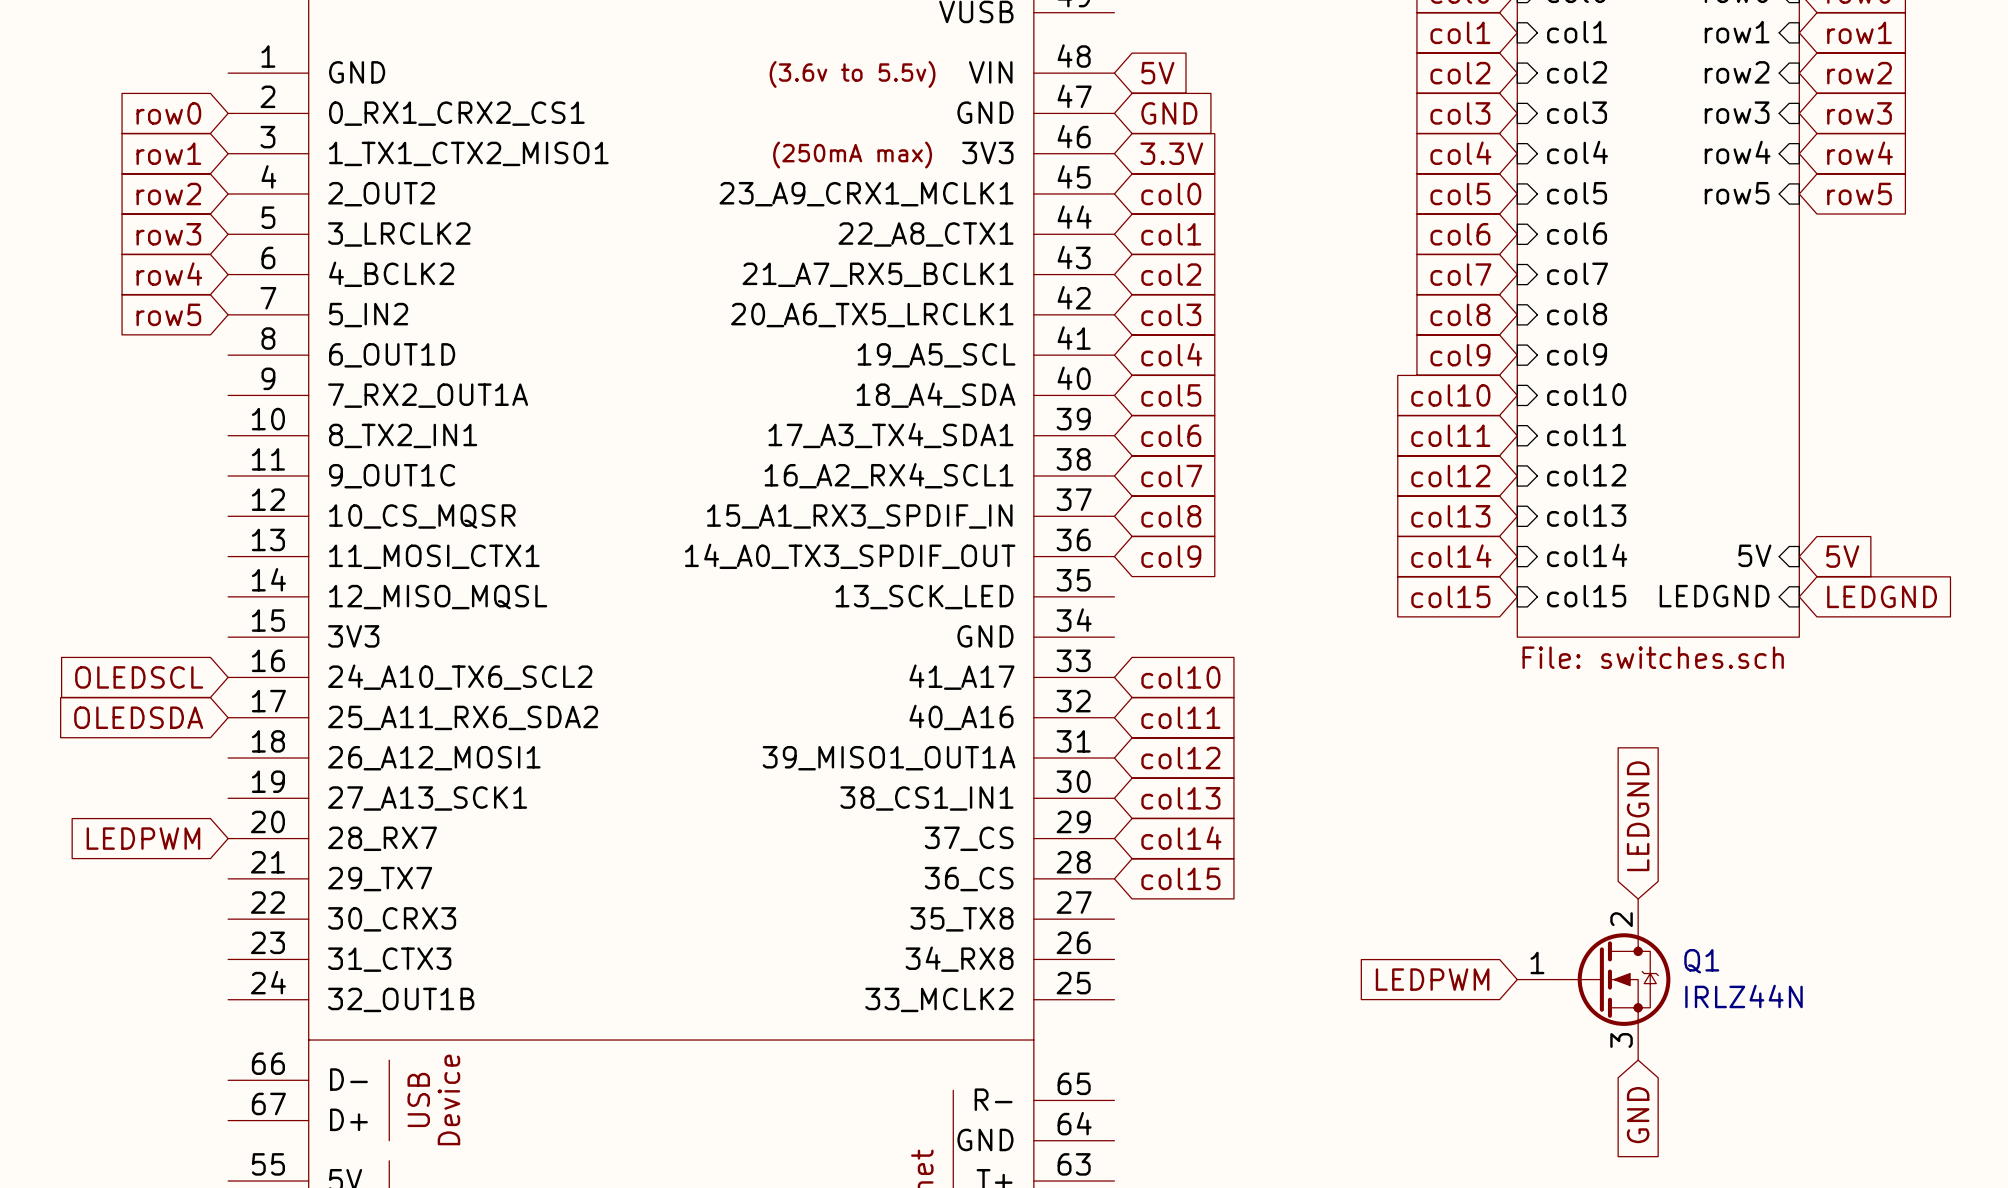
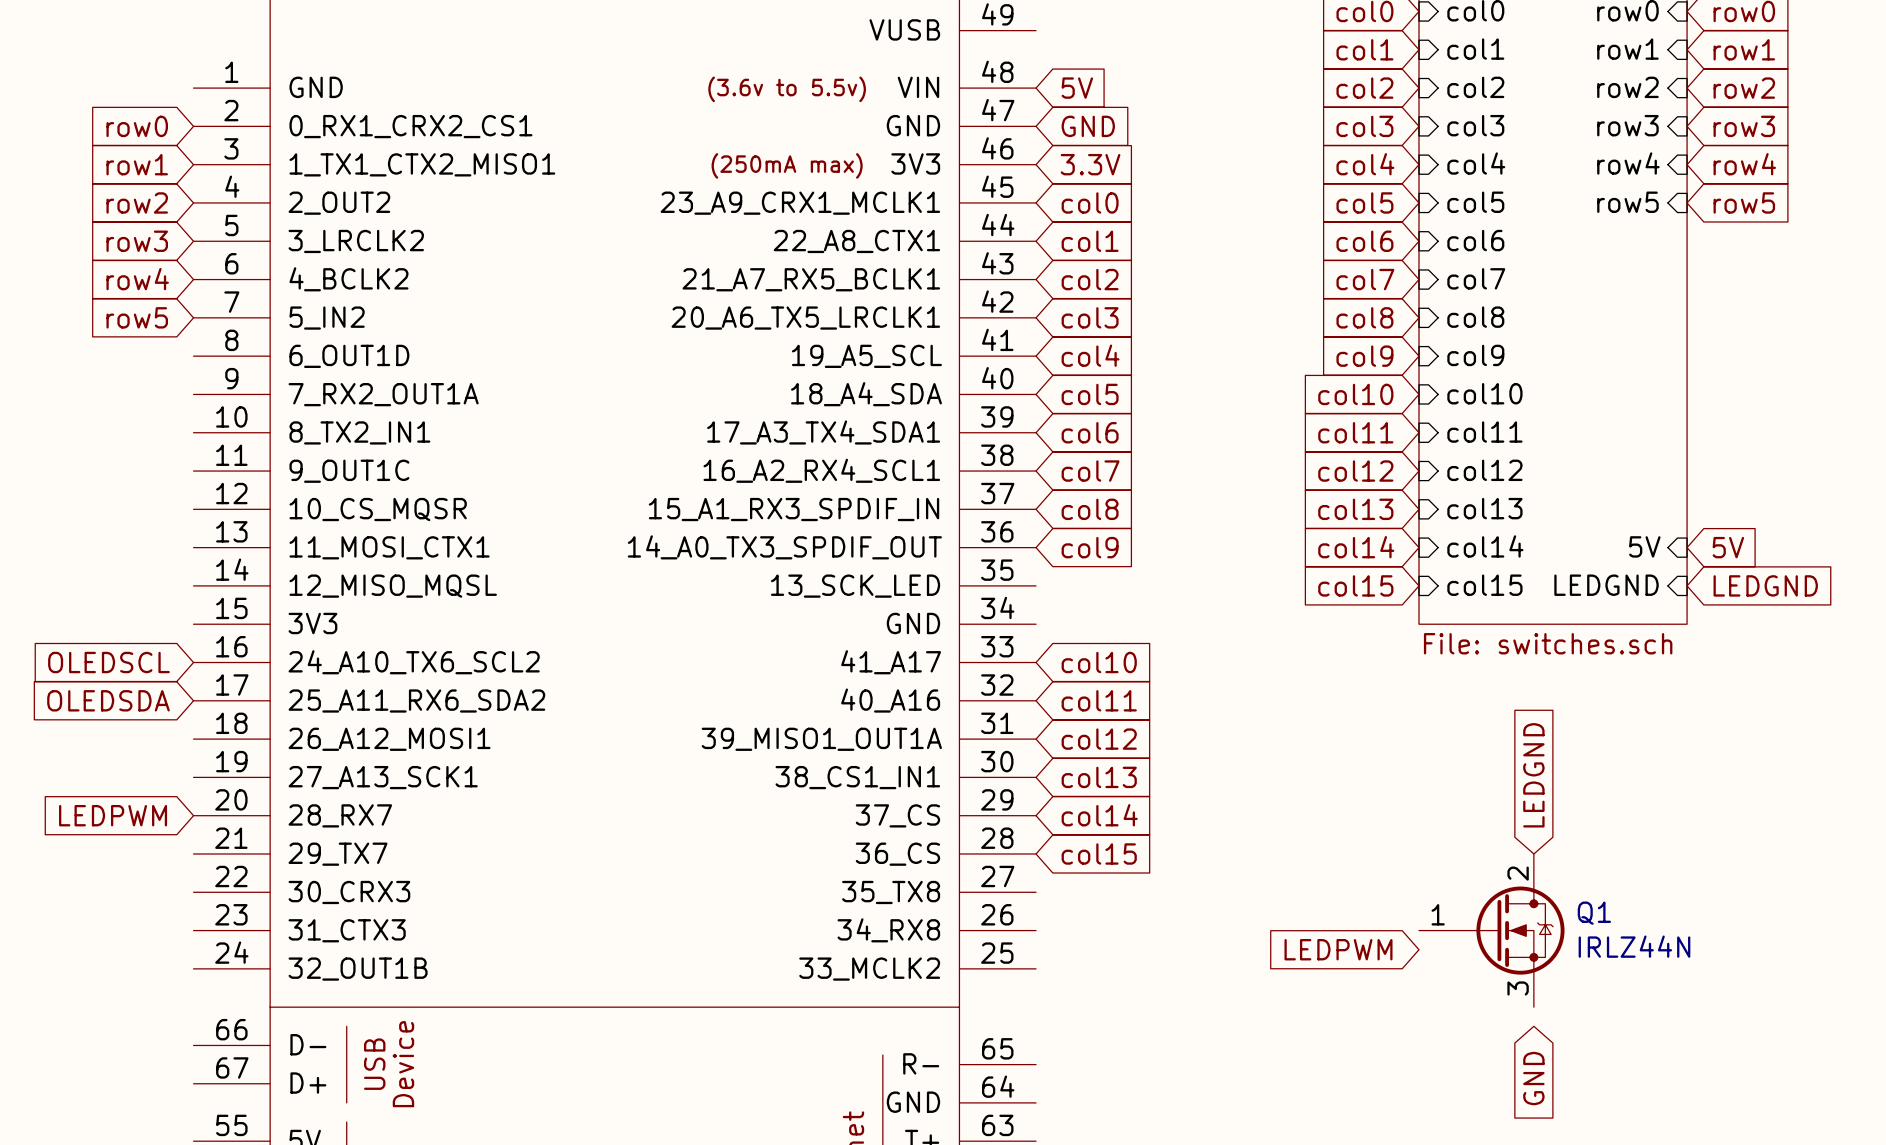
global label position: LEDGND (1638, 816) -> LEDGND (1533, 775)
Q1 position: (1593, 979) -> (1491, 930)

